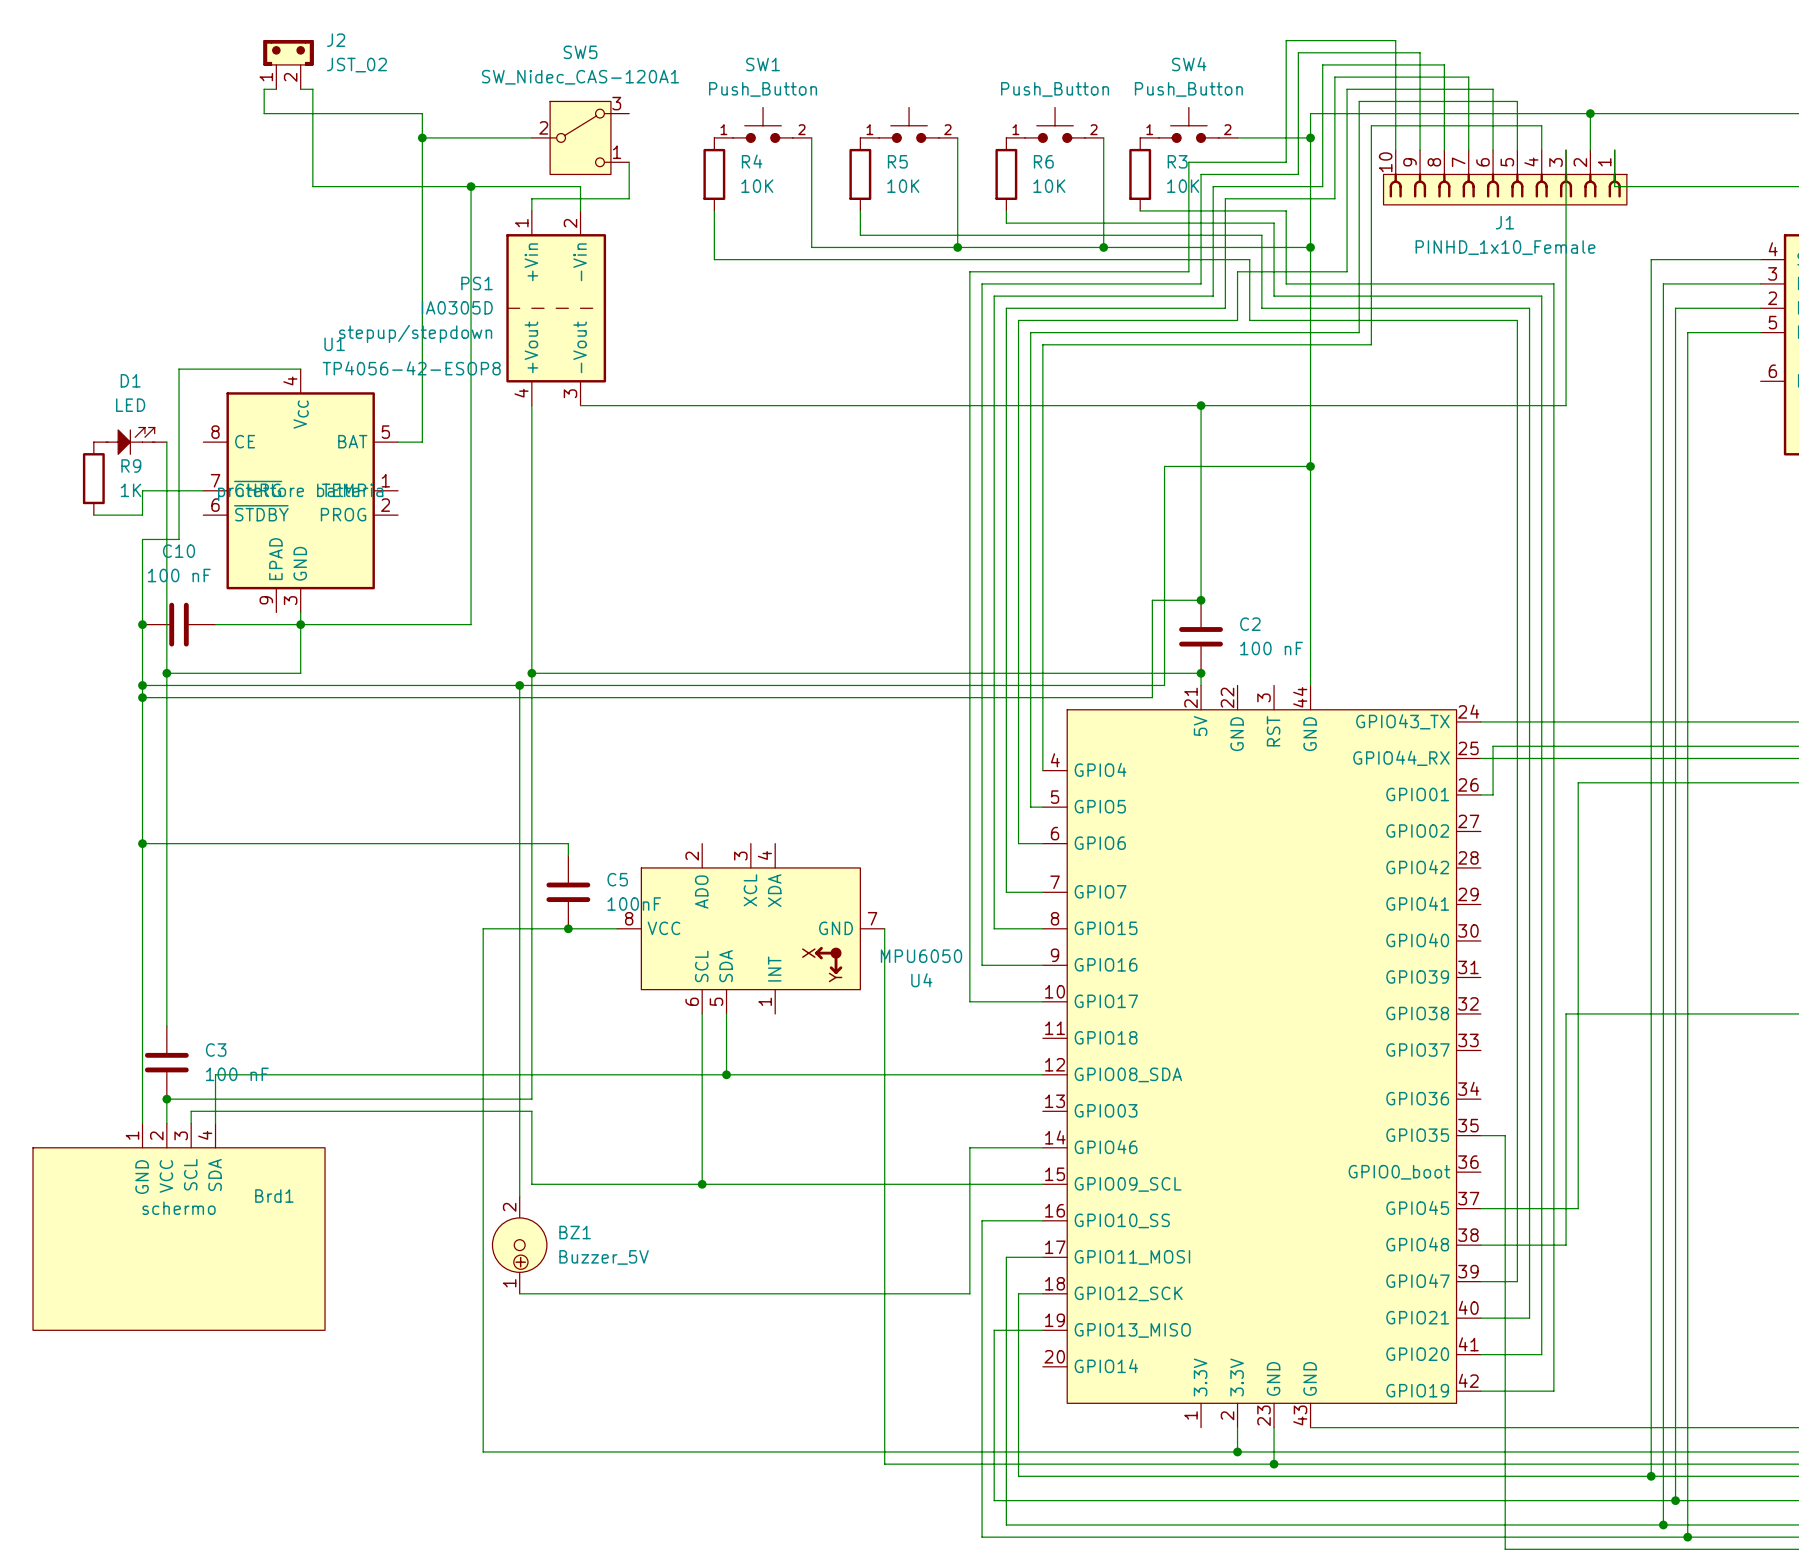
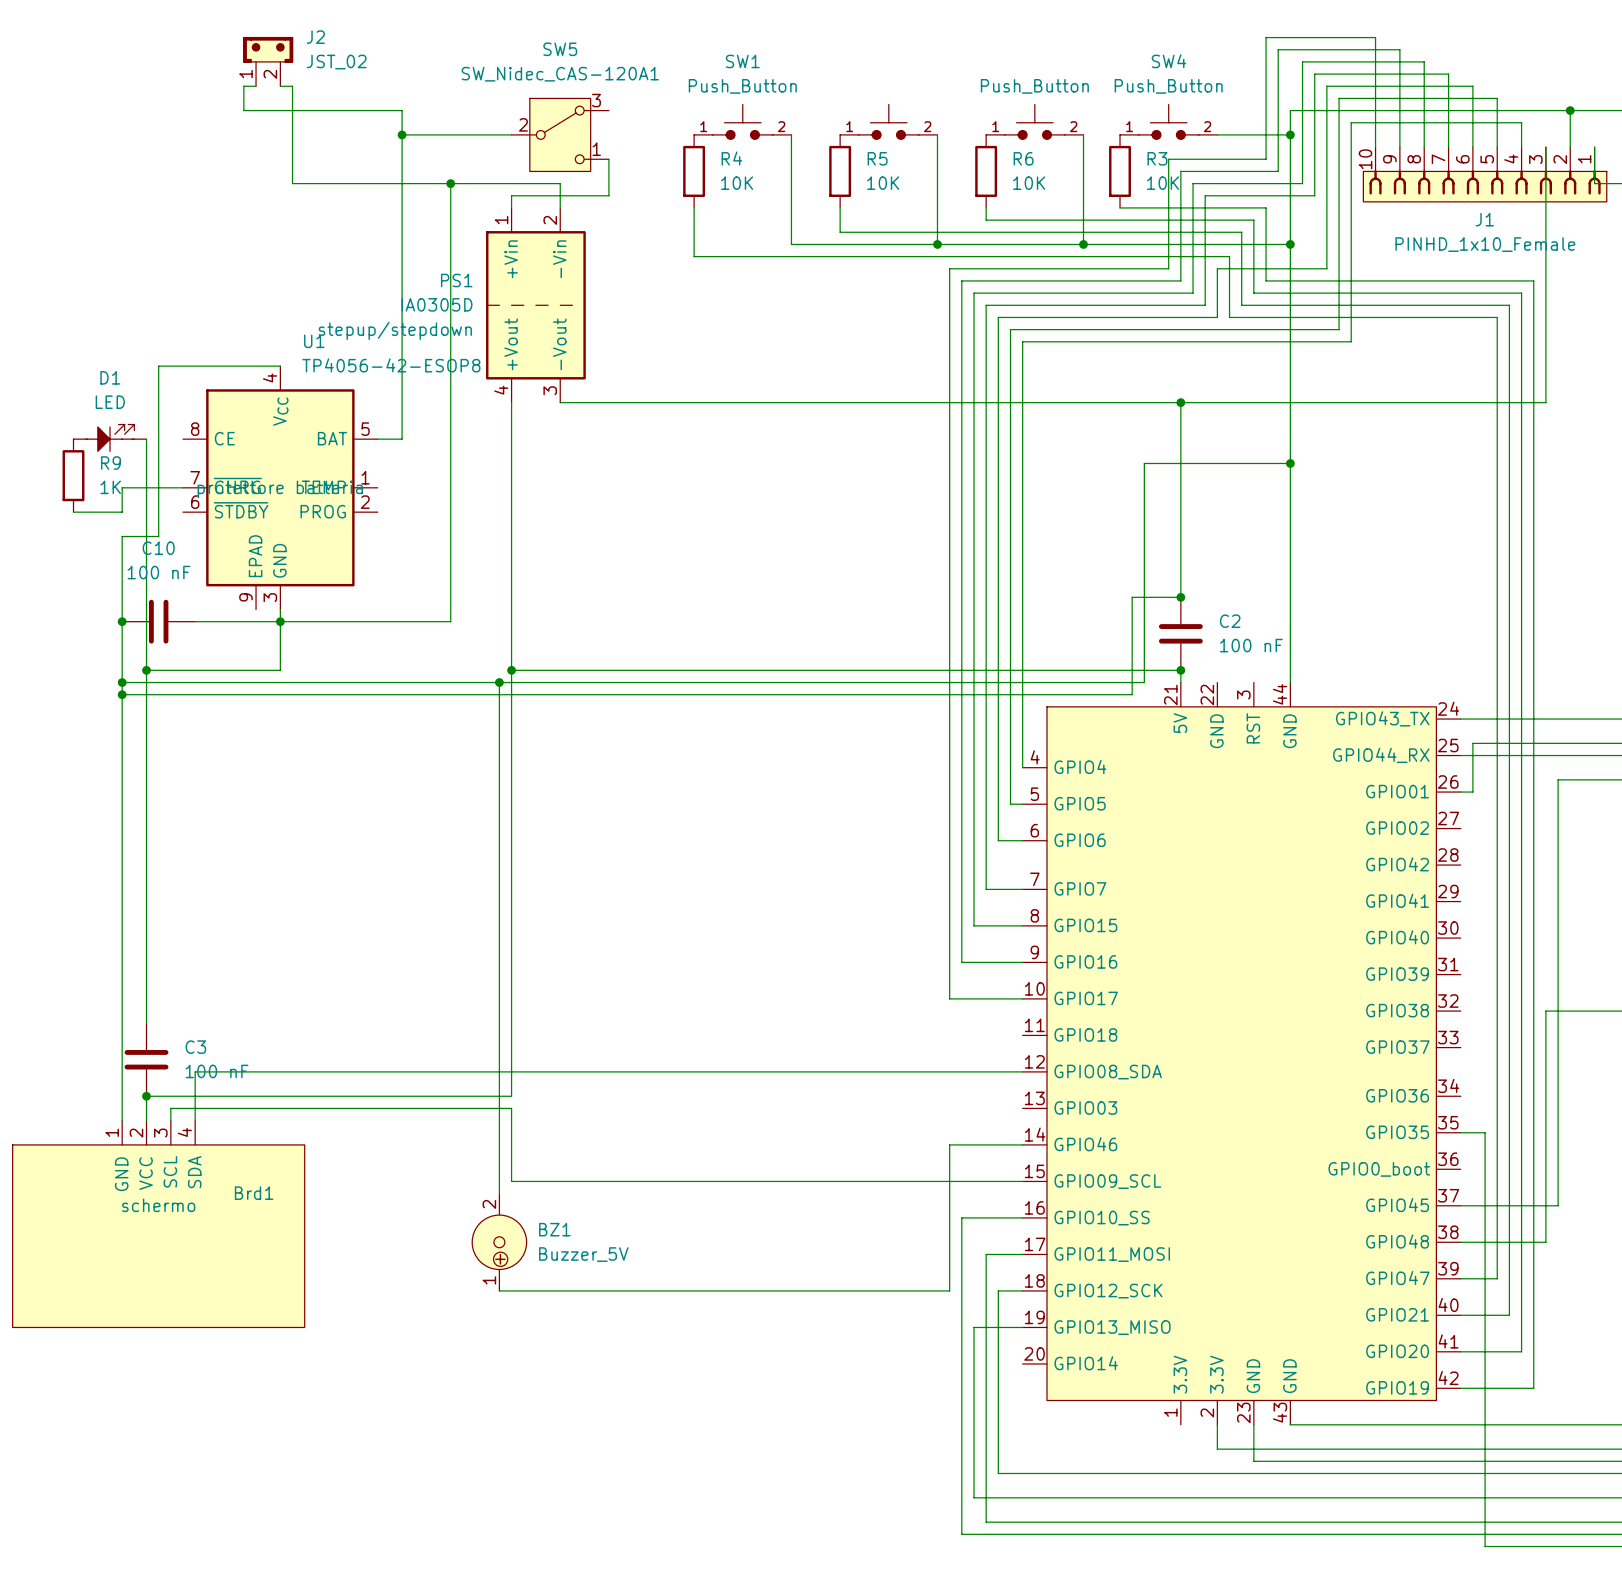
wire: (142, 843) (568, 843) (568, 855) -> none
junction: (142, 843) -> none
C5: 100nF (568, 892) -> none
junction: (568, 928) -> none
wire: (617, 928) (483, 928) (483, 1451) (1237, 1451) -> none
U4: MPU6050 (750, 928) -> none
wire: (884, 928) (884, 1464) (1274, 1464) -> none
wire: (702, 1013) (702, 1184) -> none
wire: (726, 1013) (726, 1074) -> none
junction: (726, 1074) -> none
junction: (702, 1184) -> none
junction: (1237, 1451) -> none
junction: (1274, 1464) -> none

